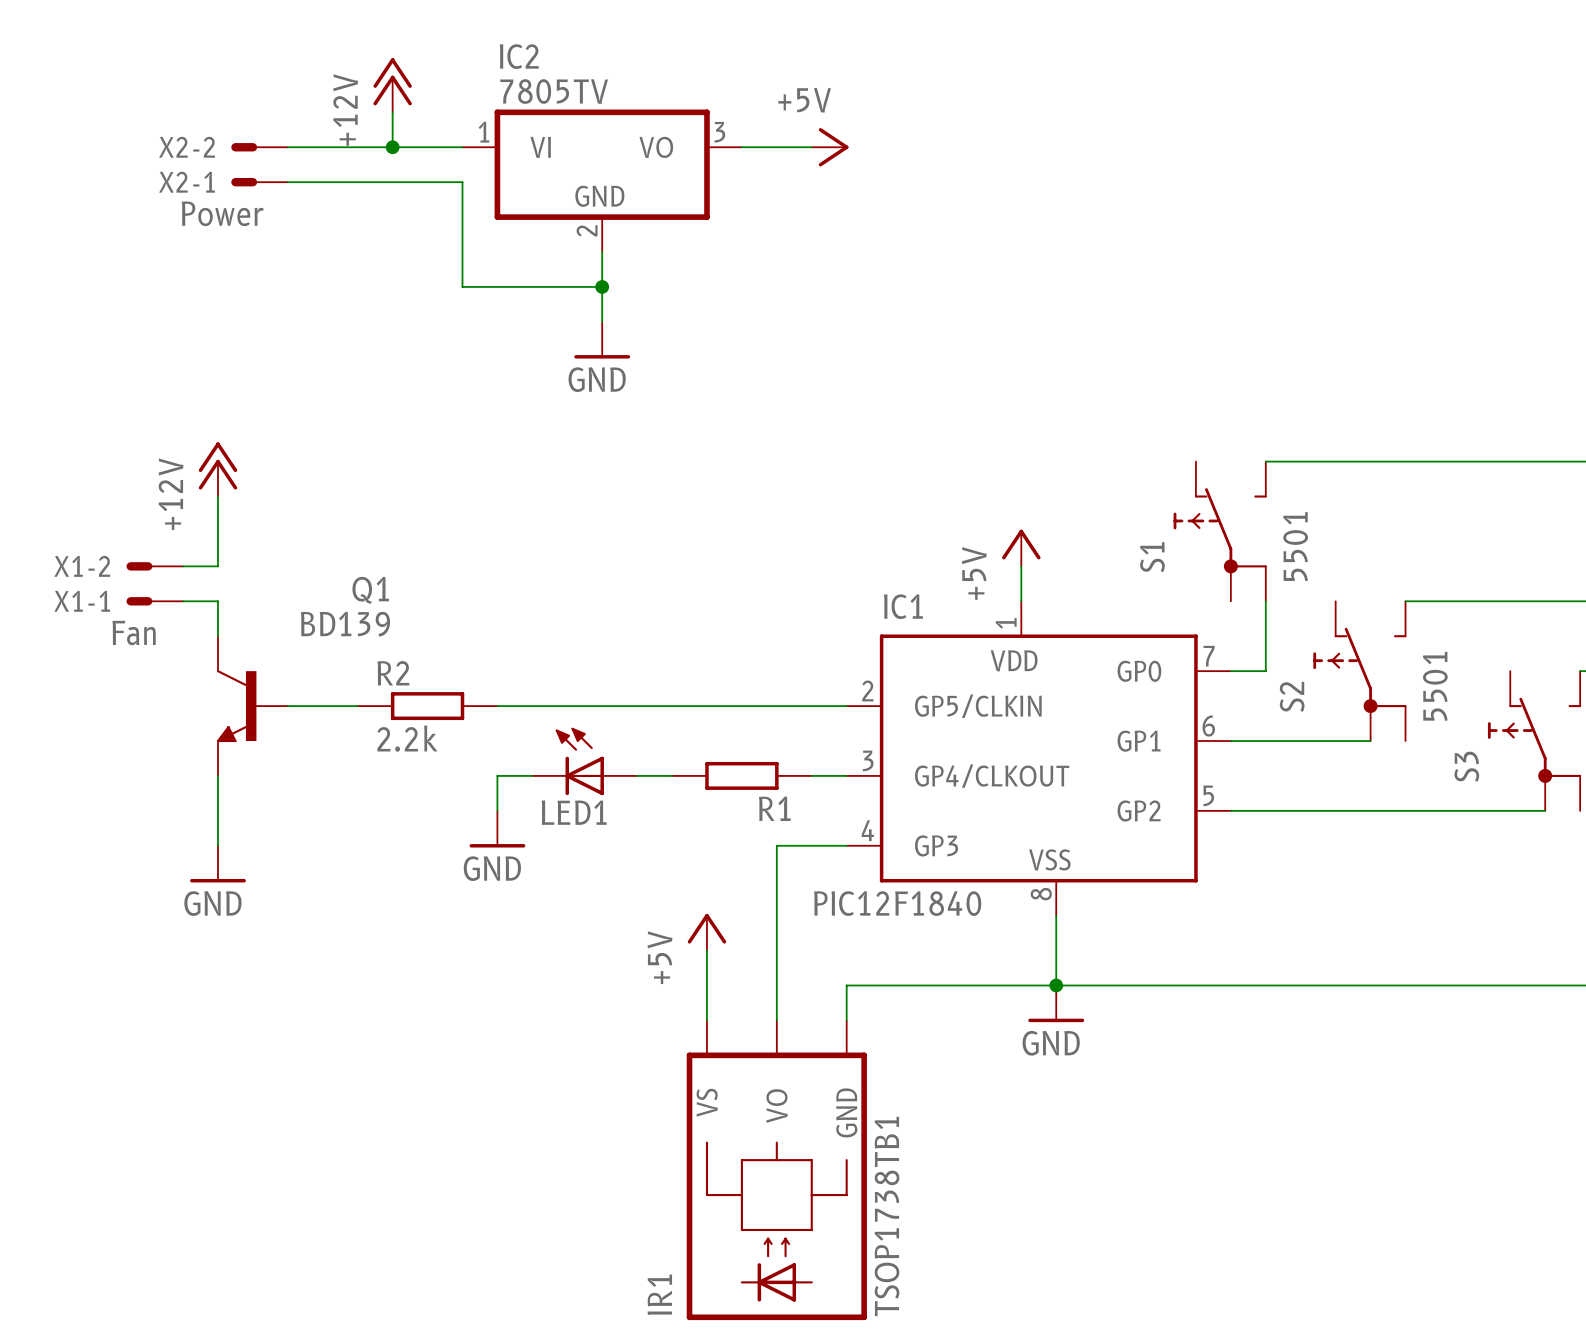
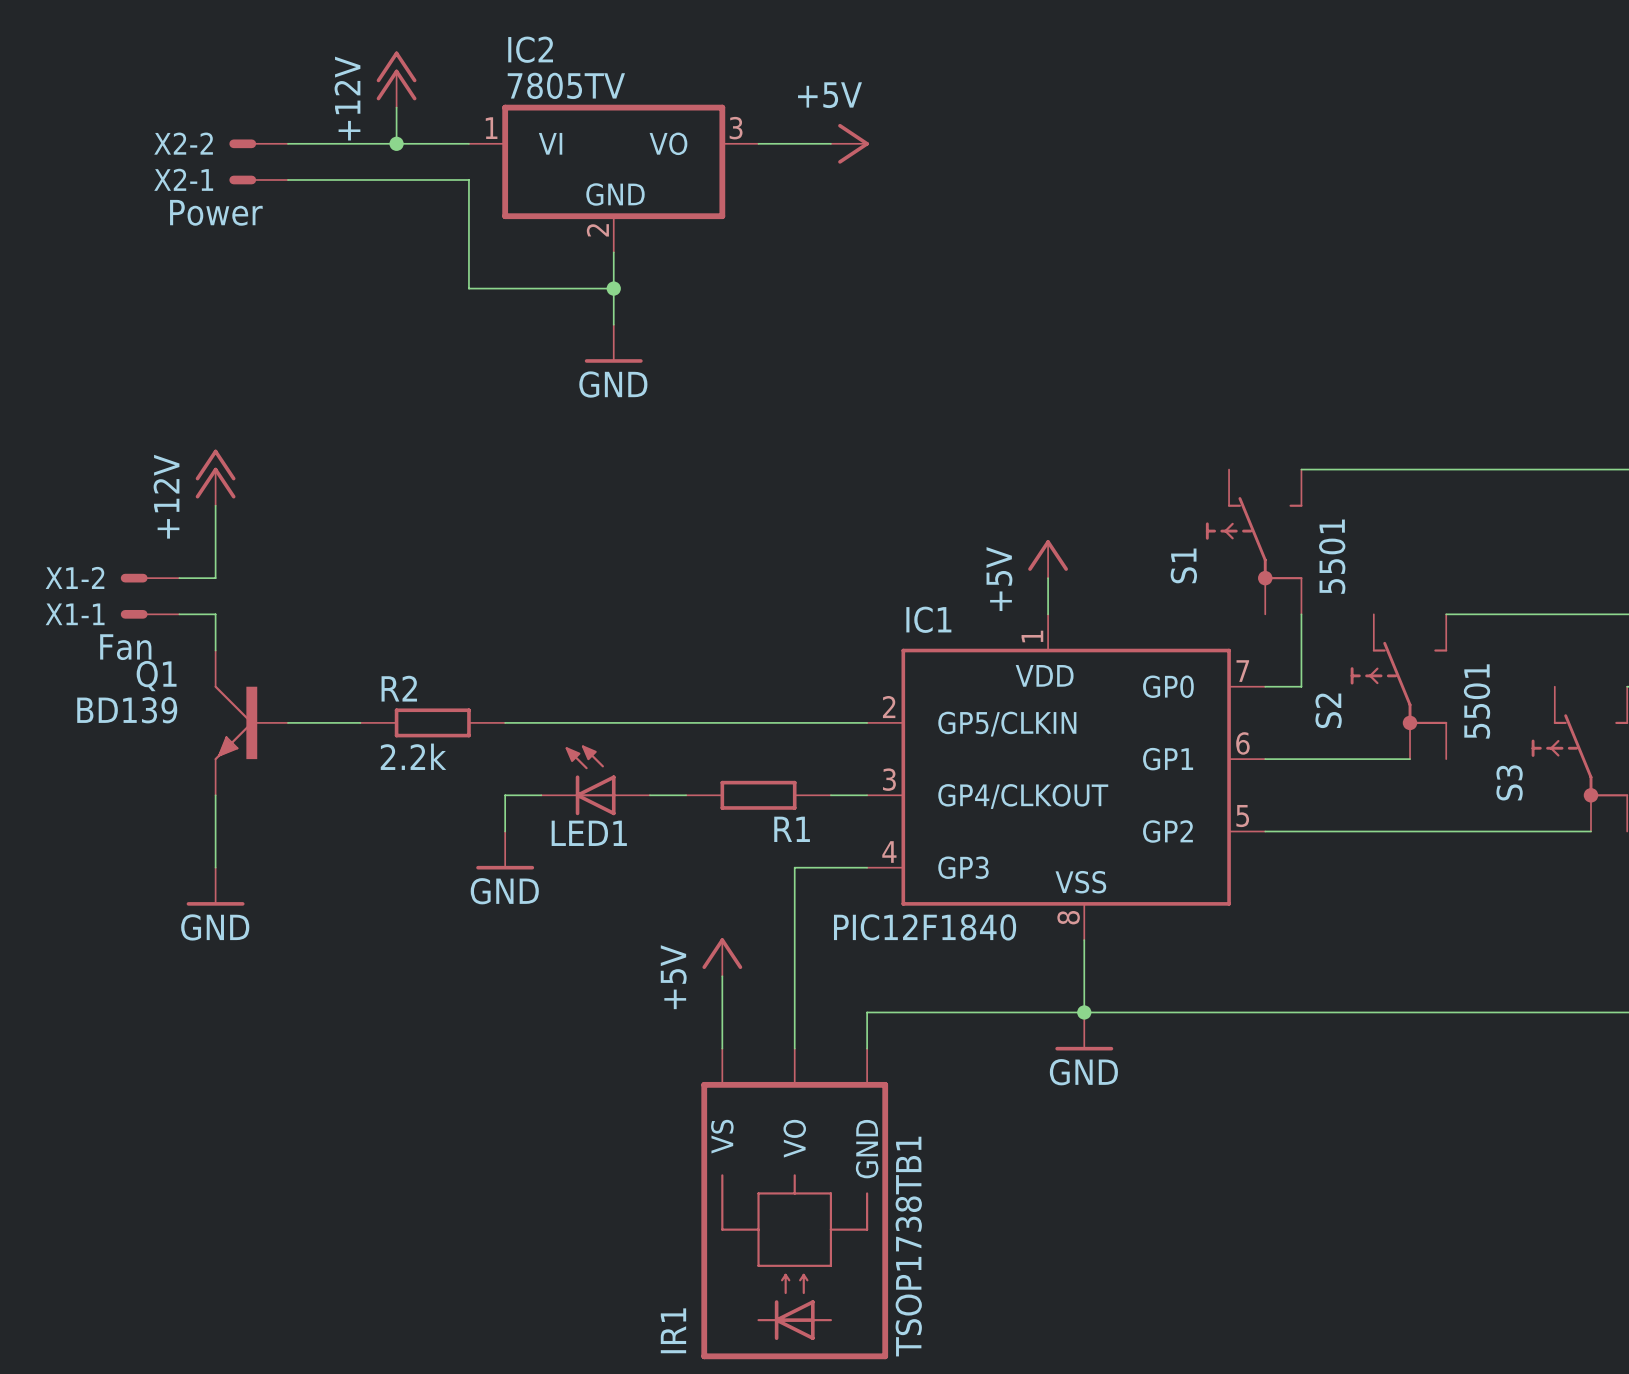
Q1 name position: Q1 (370, 590) -> Q1 (156, 676)
Q1 value position: BD139 (345, 624) -> BD139 (127, 710)
Q1 symbol: [216, 636, 288, 776] -> [214, 650, 288, 796]

